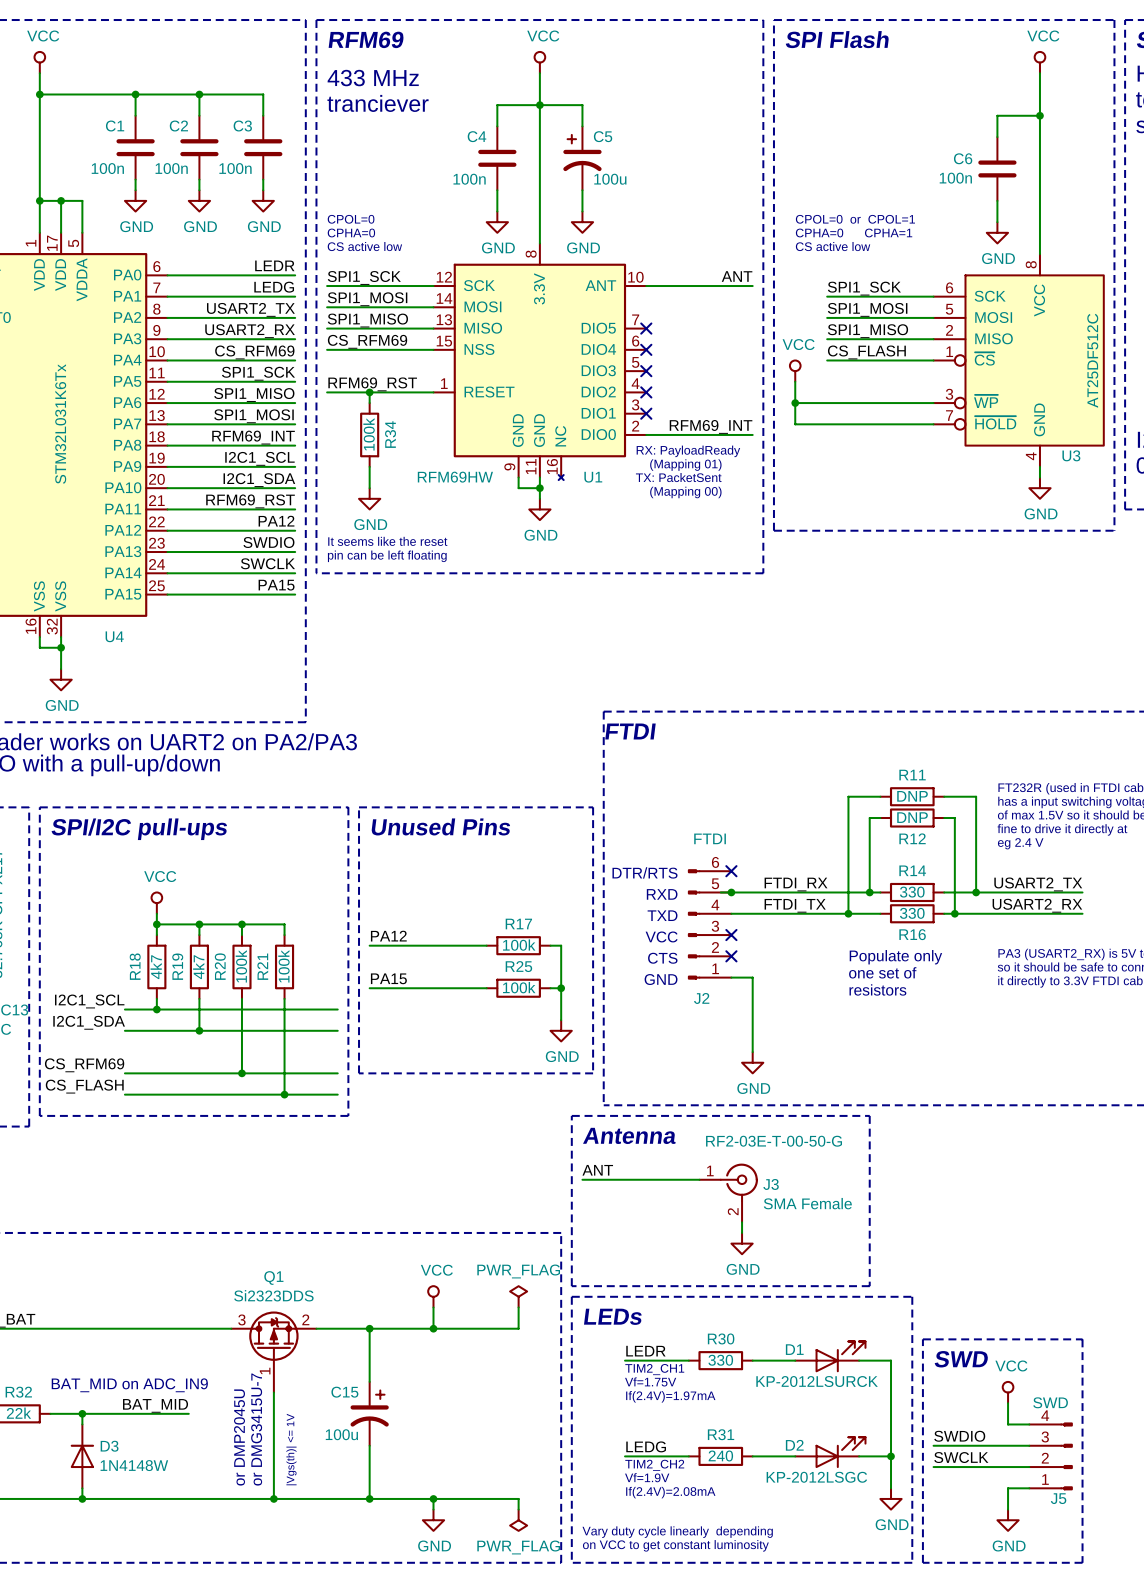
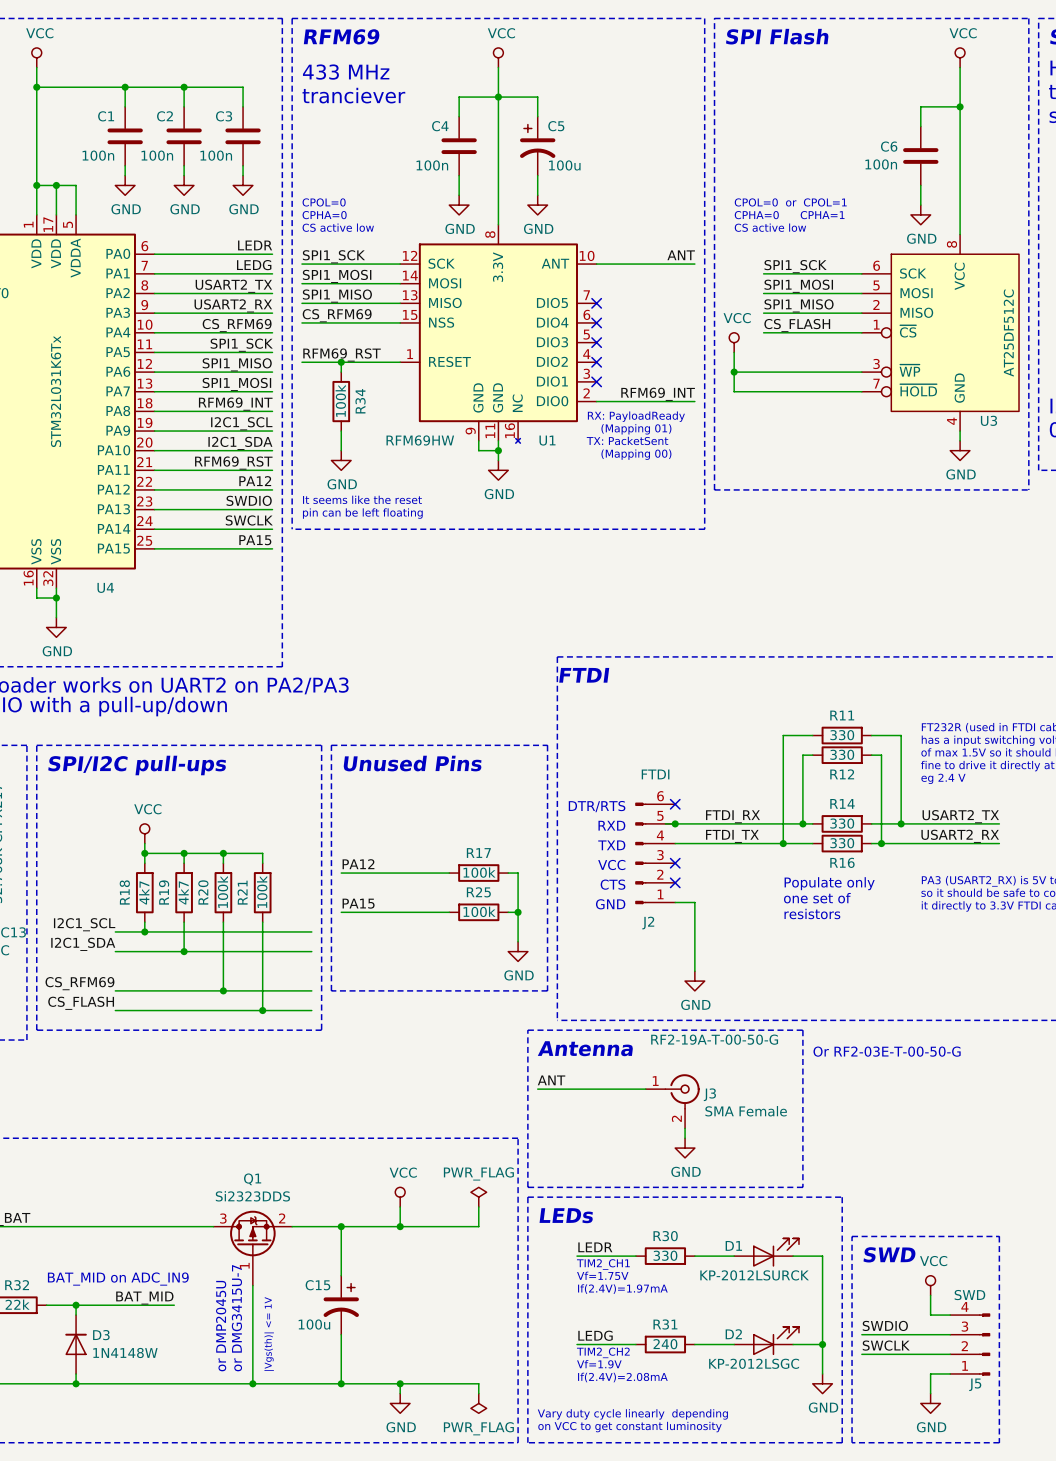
R11 value: DNP (912, 796) -> 330 (842, 735)
R12 value: DNP (912, 817) -> 330 (842, 754)
text: none -> Or RF2-03E-T-00-50-G (887, 1051)
J3 text: RF2-03E-T-00-50-G (774, 1141) -> RF2-19A-T-00-50-G (714, 1039)

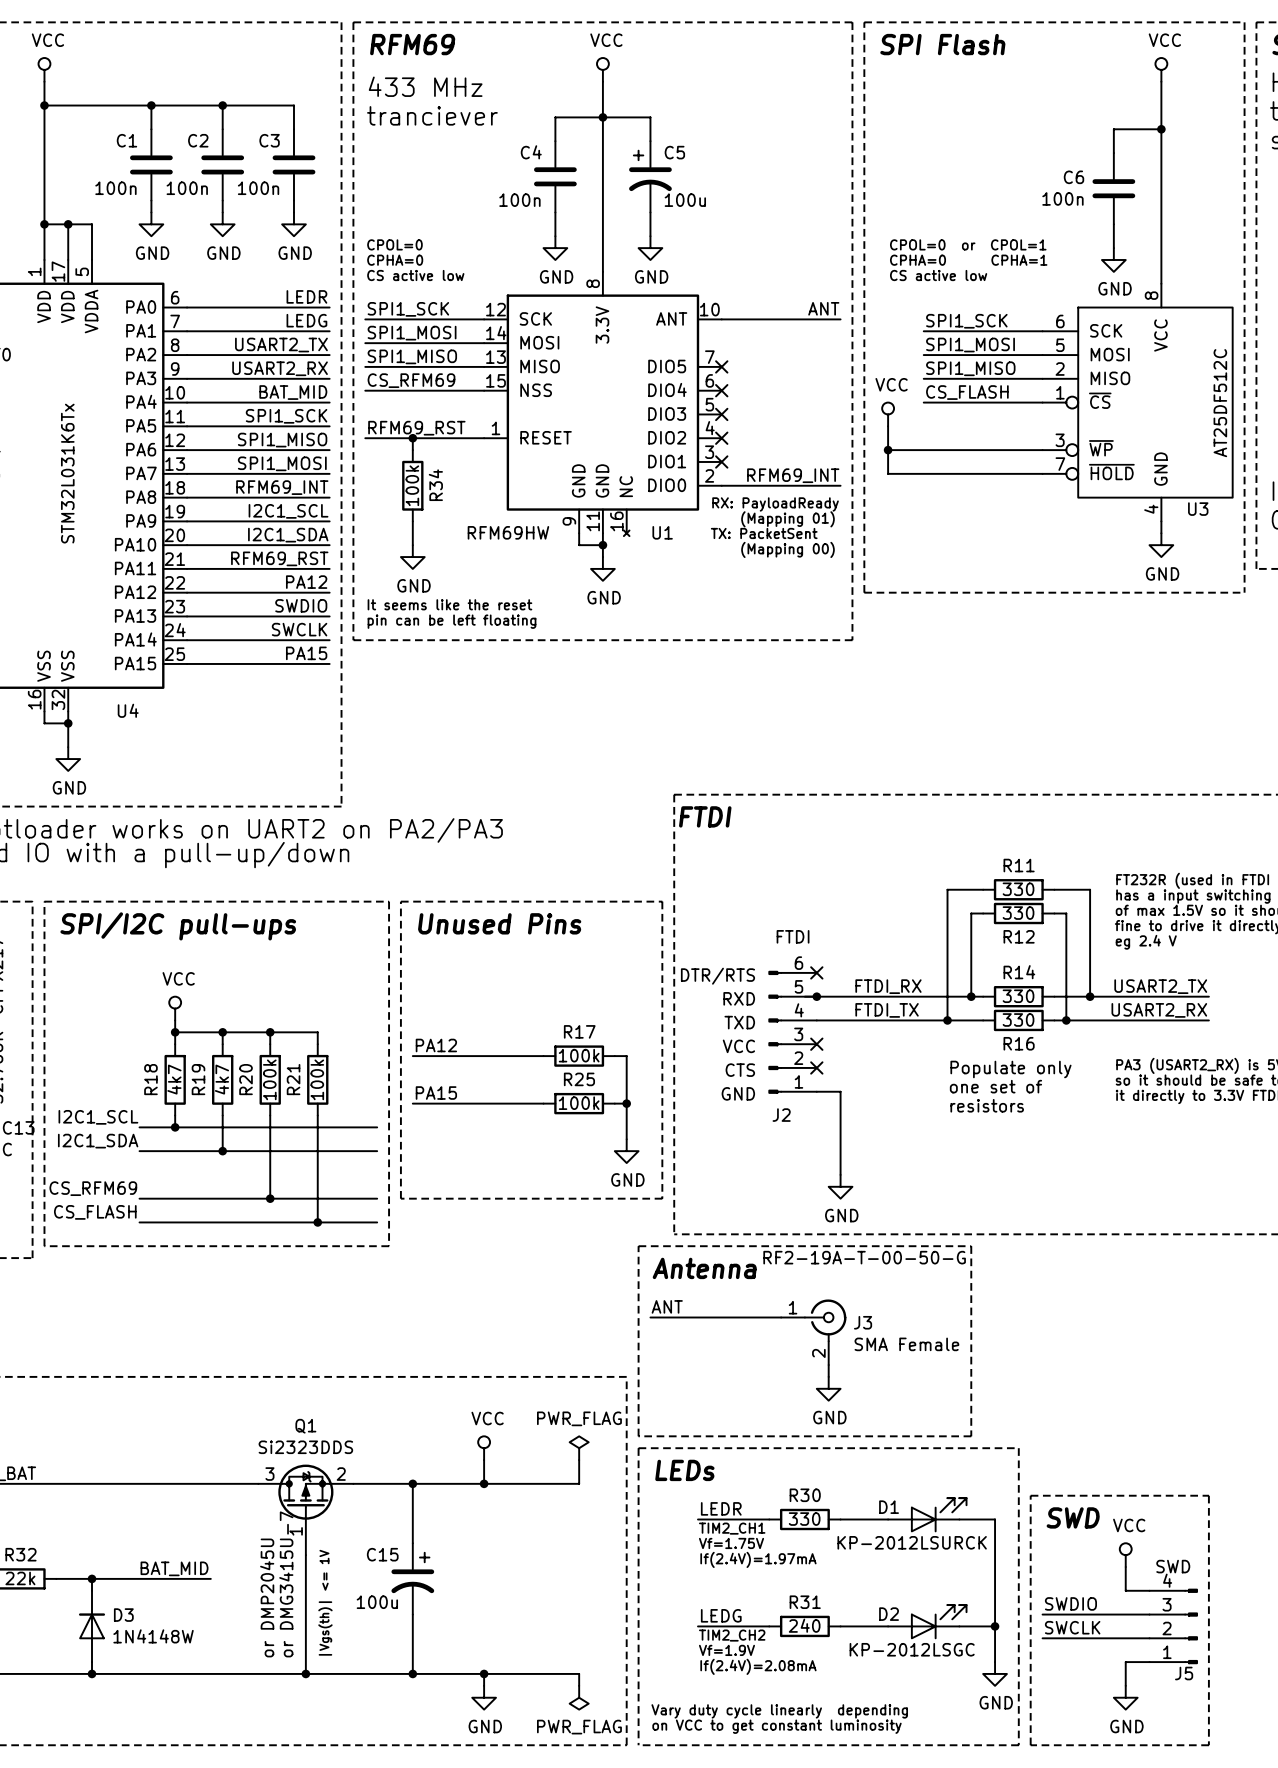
label: CS_RFM69 (237, 325) -> BAT_MID (293, 392)
text: Or RF2-03E-T-00-50-G (887, 1051) -> none
text: BAT_MID on ADC_IN9 (118, 1279) -> none

